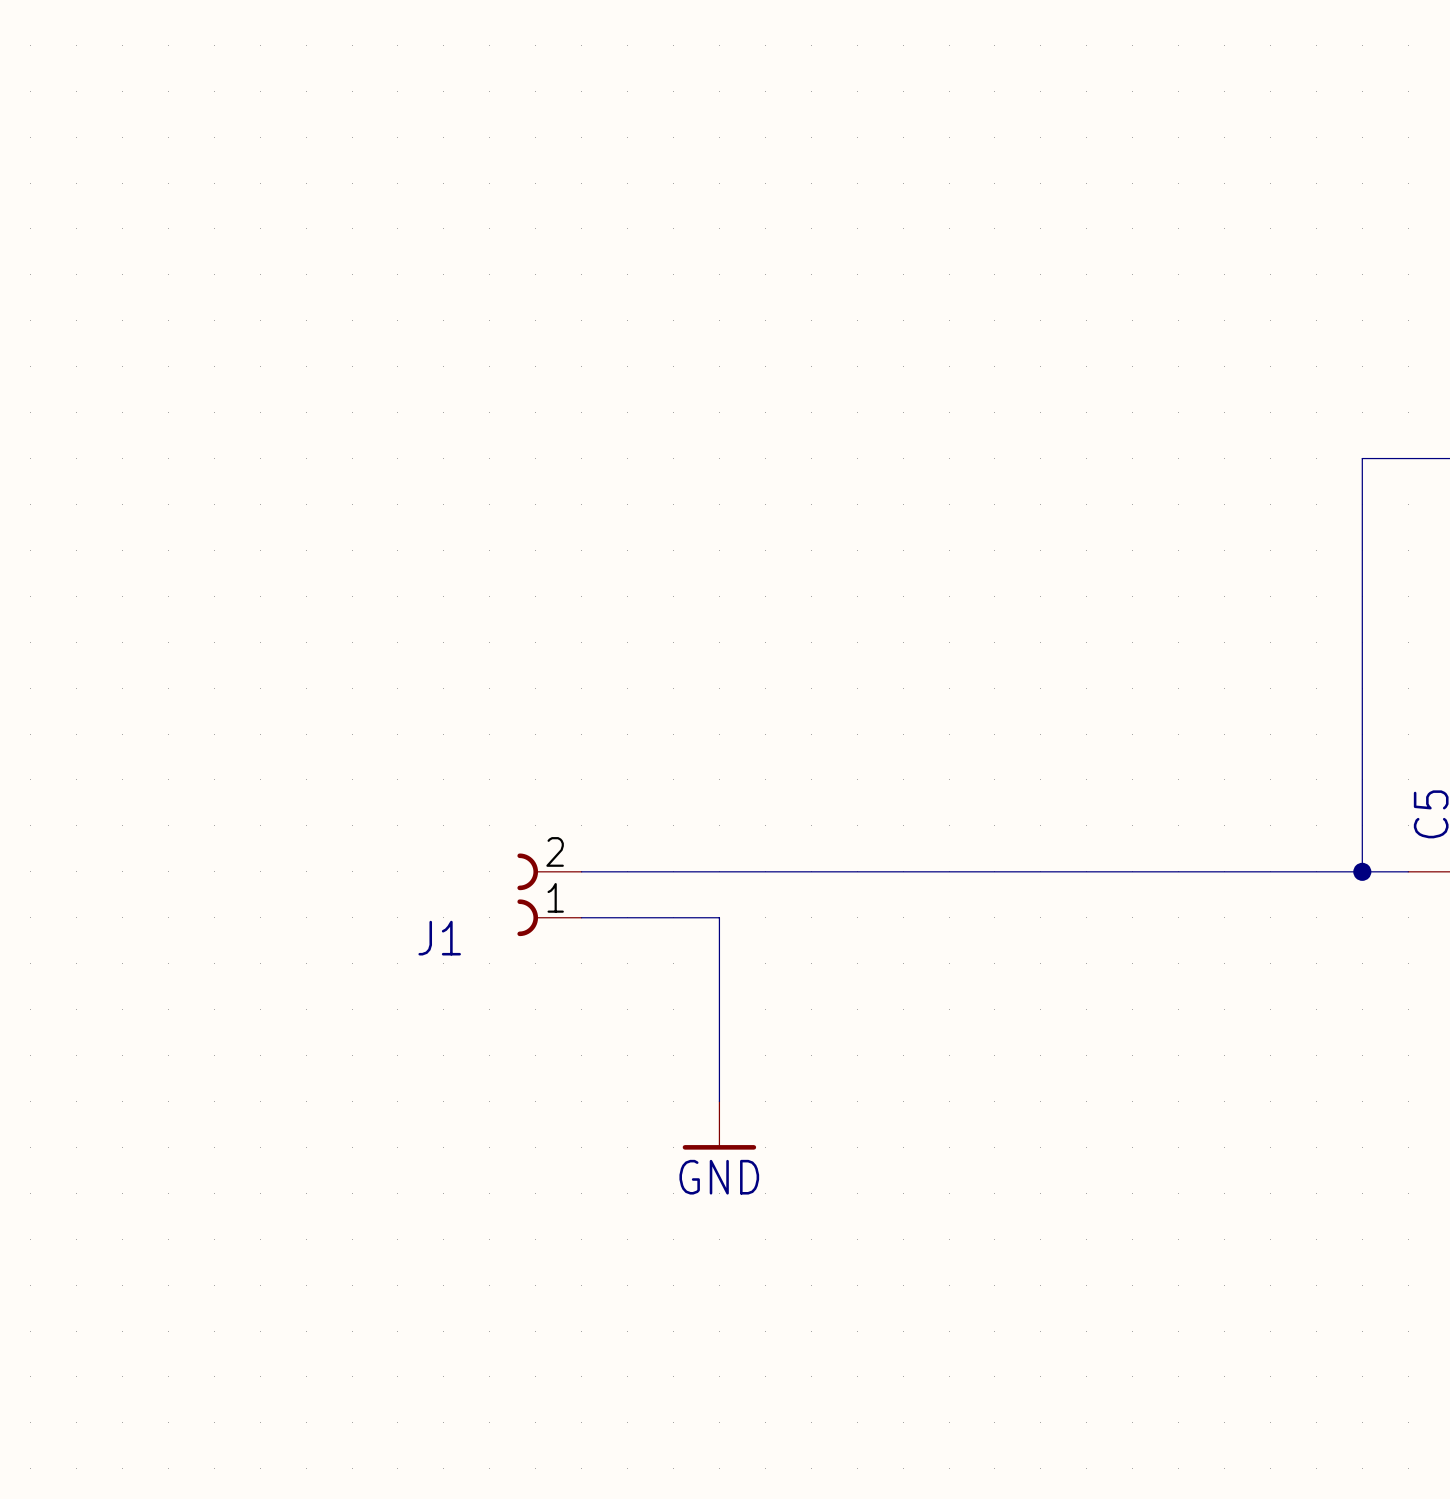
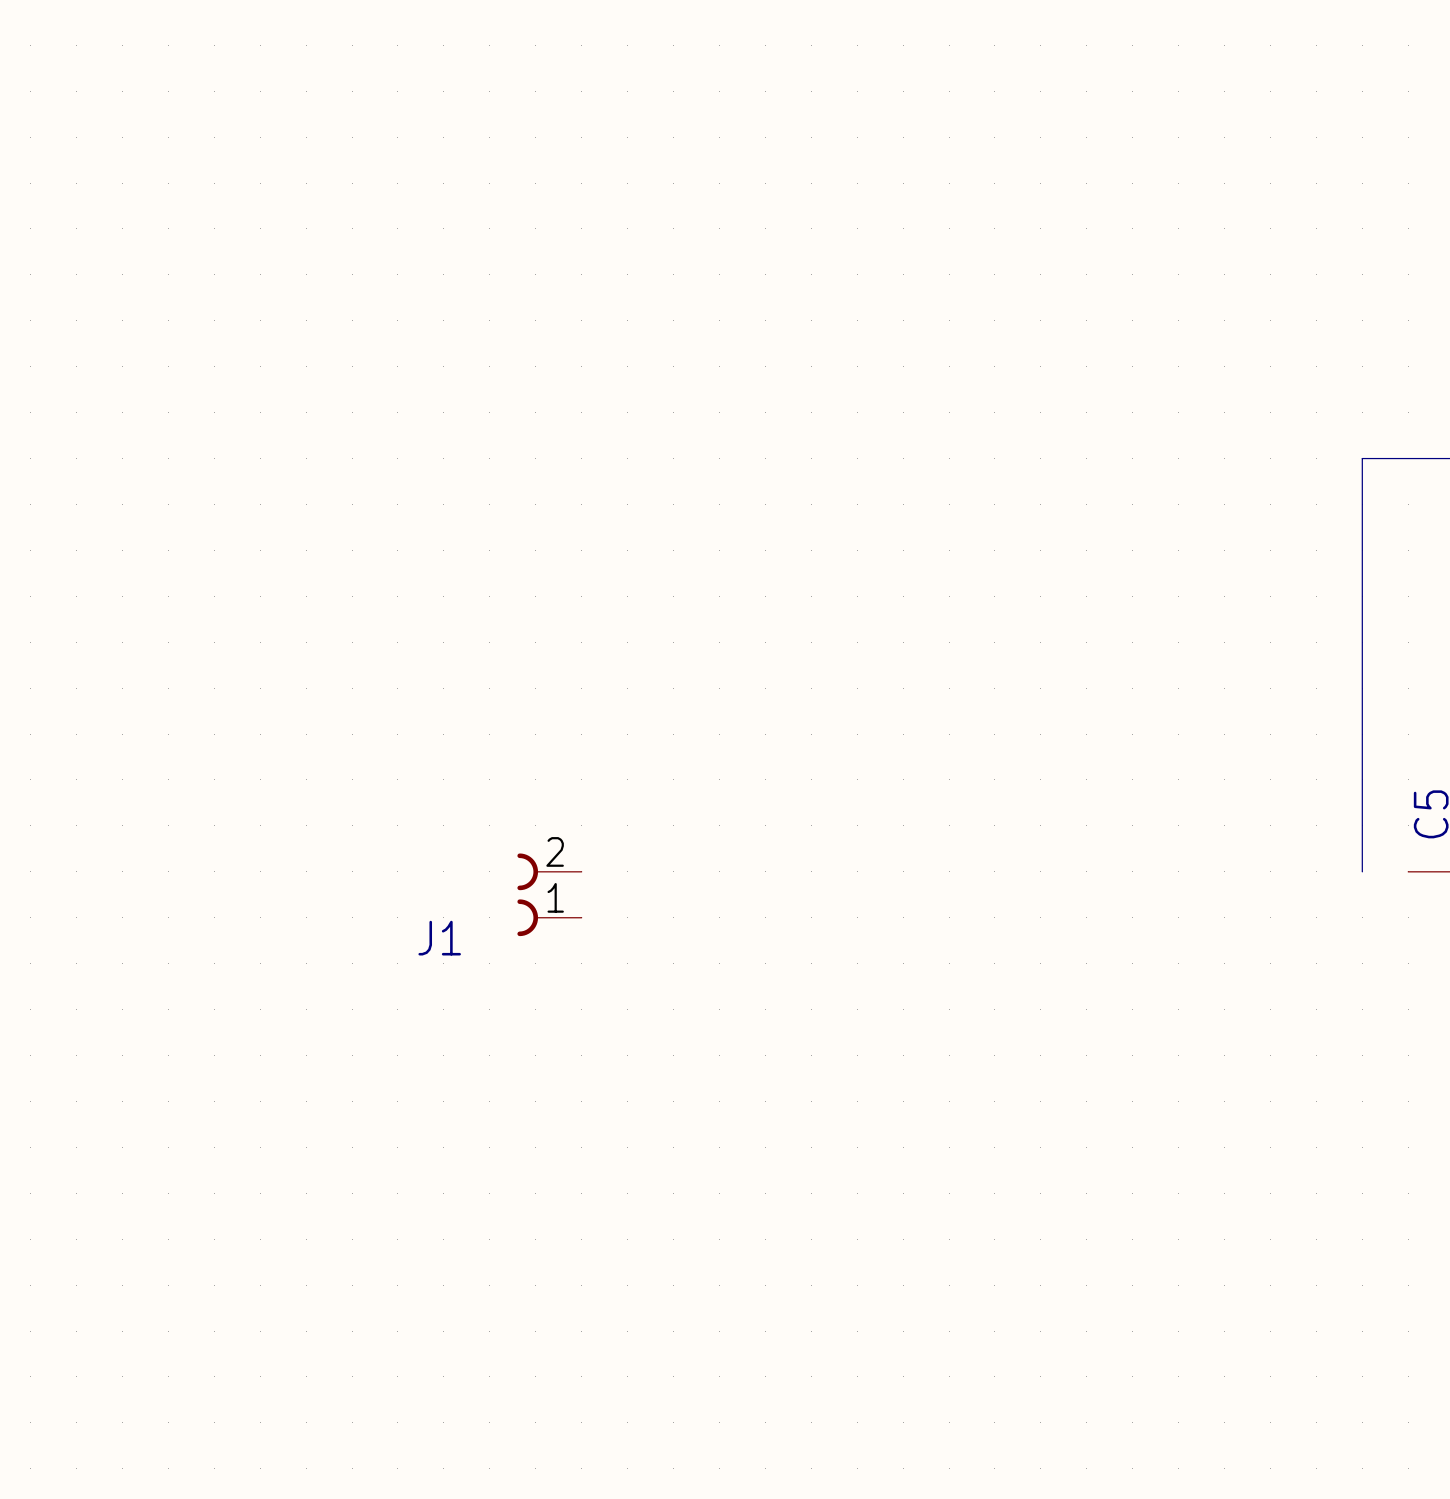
wire: (581, 871) (1408, 871) -> none
junction: (1362, 871) -> none
wire: (581, 917) (719, 917) (719, 1101) -> none
power symbol: GND (719, 1125) -> none

